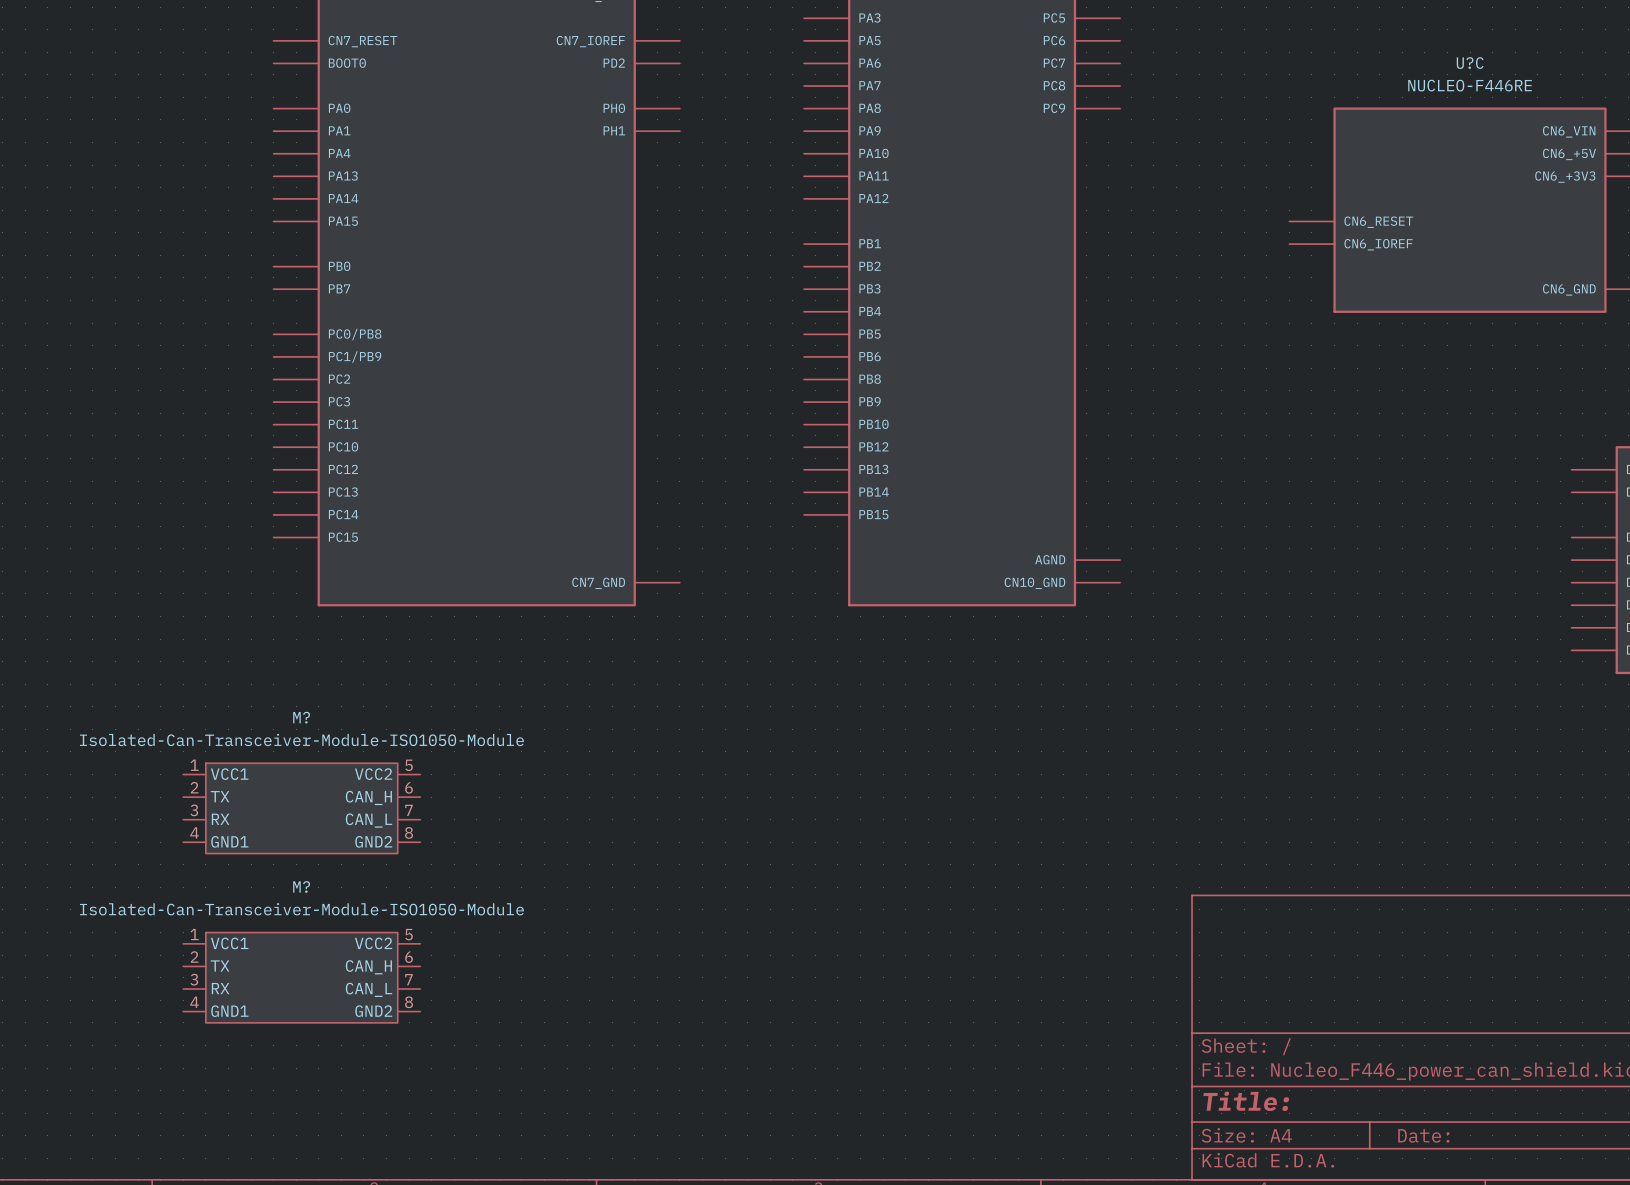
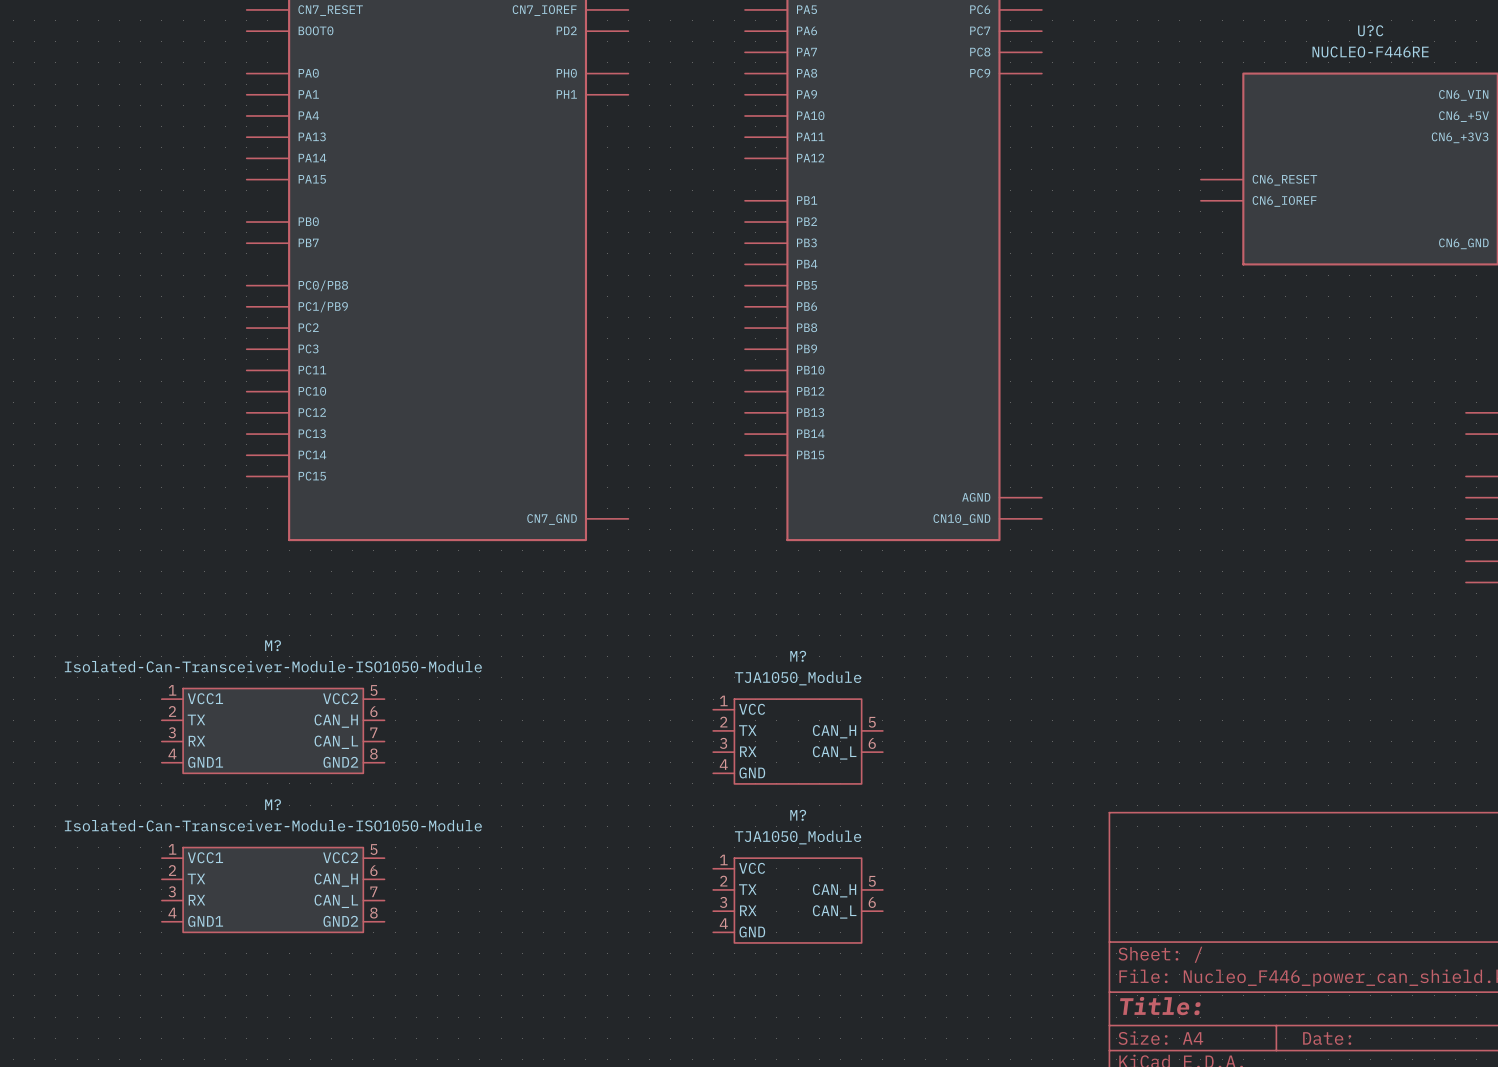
M?: none -> TJA1050_Module (798, 741)
M?: none -> TJA1050_Module (798, 900)

